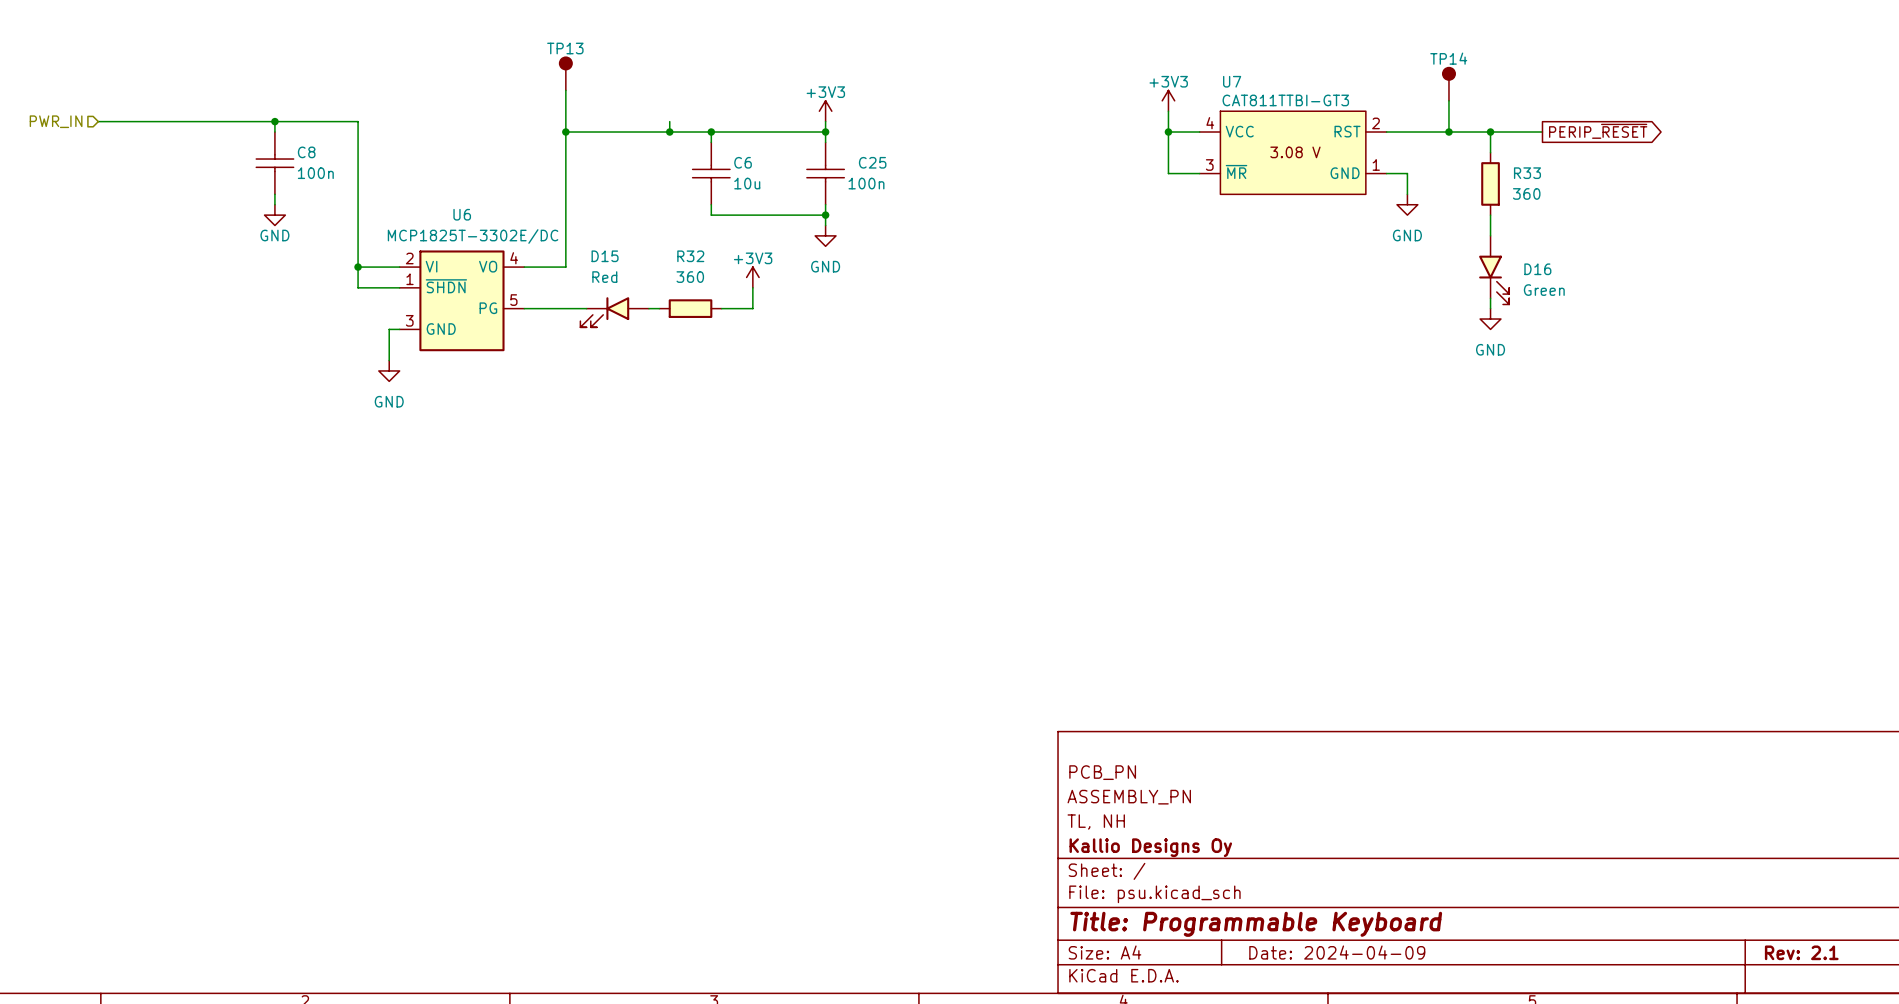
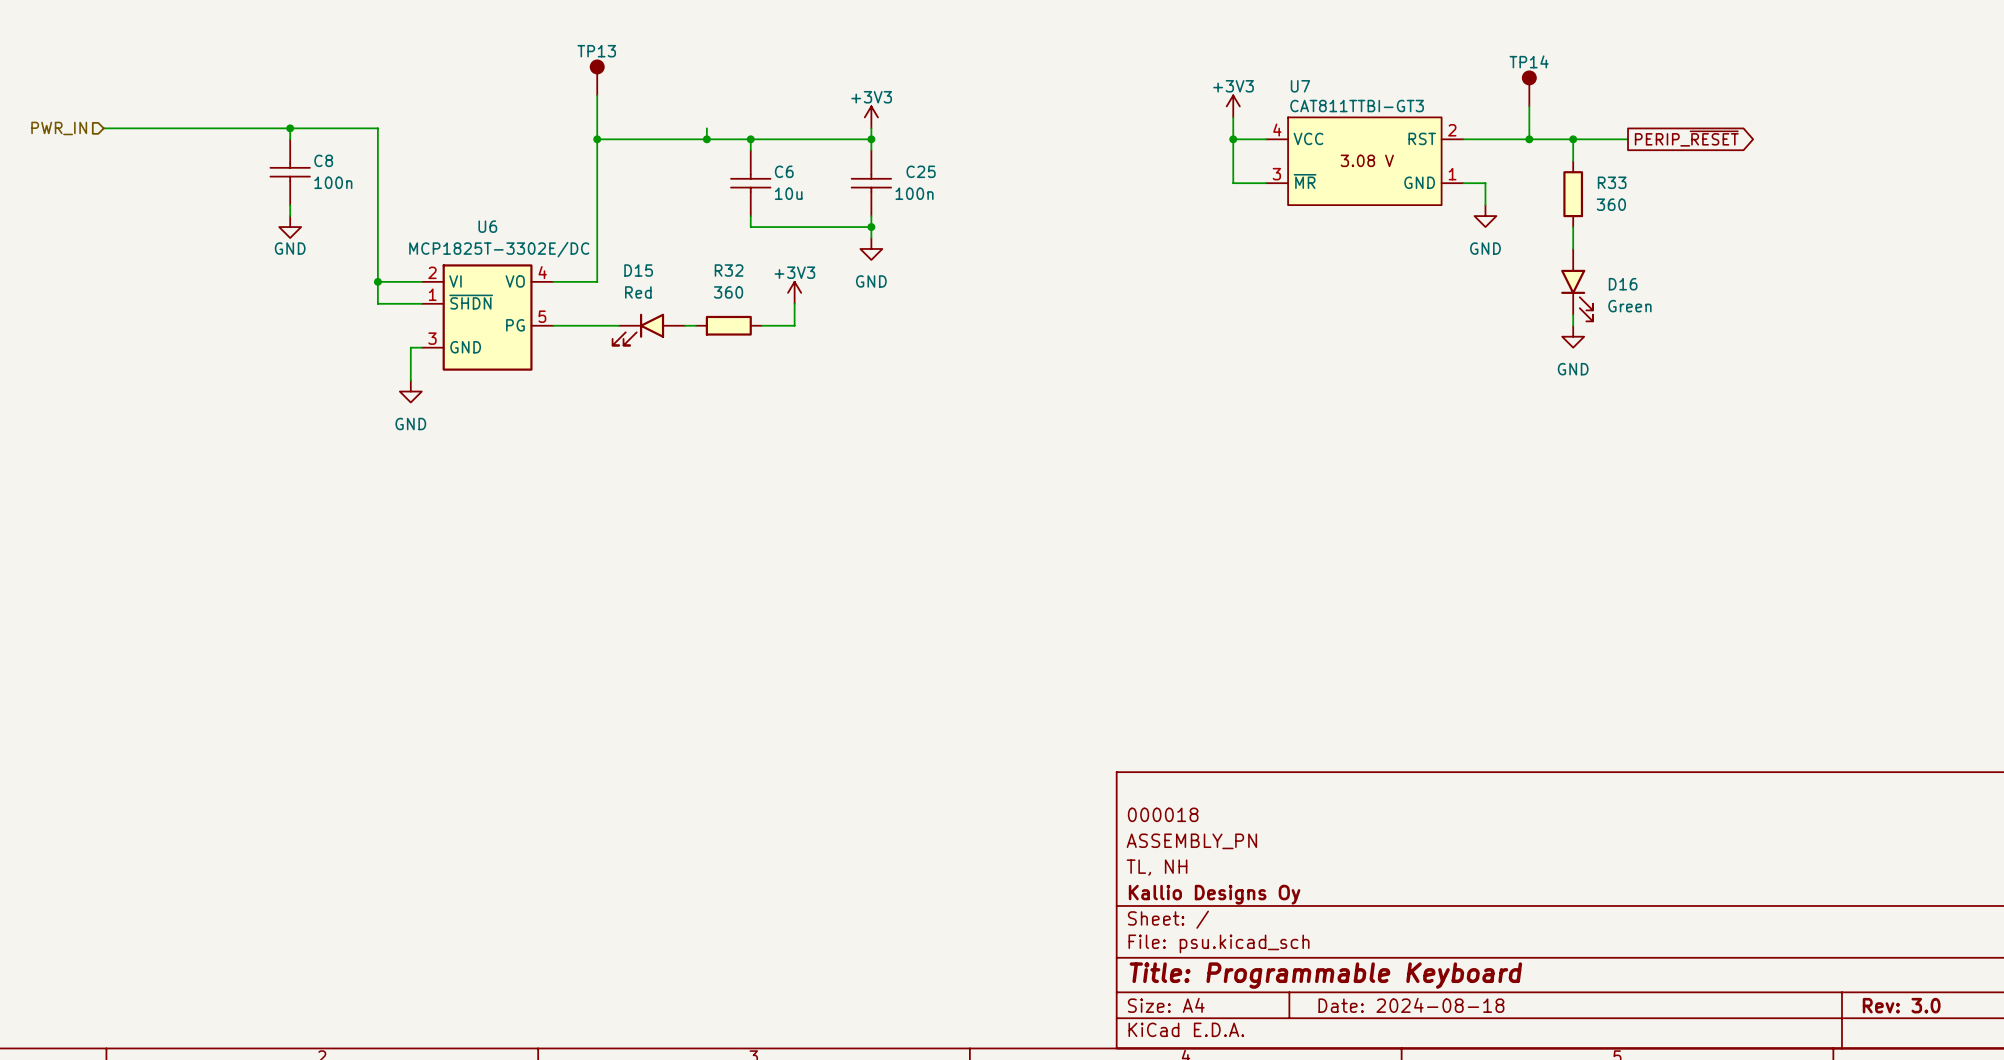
title block: PCB_PN (1102, 772) -> 000018 (1163, 814)
title block: Date: 2024-04-09 (1337, 952) -> Date: 2024-08-18 (1411, 1005)
title block: Rev: 2.1 (1801, 952) -> Rev: 3.0 (1901, 1005)

